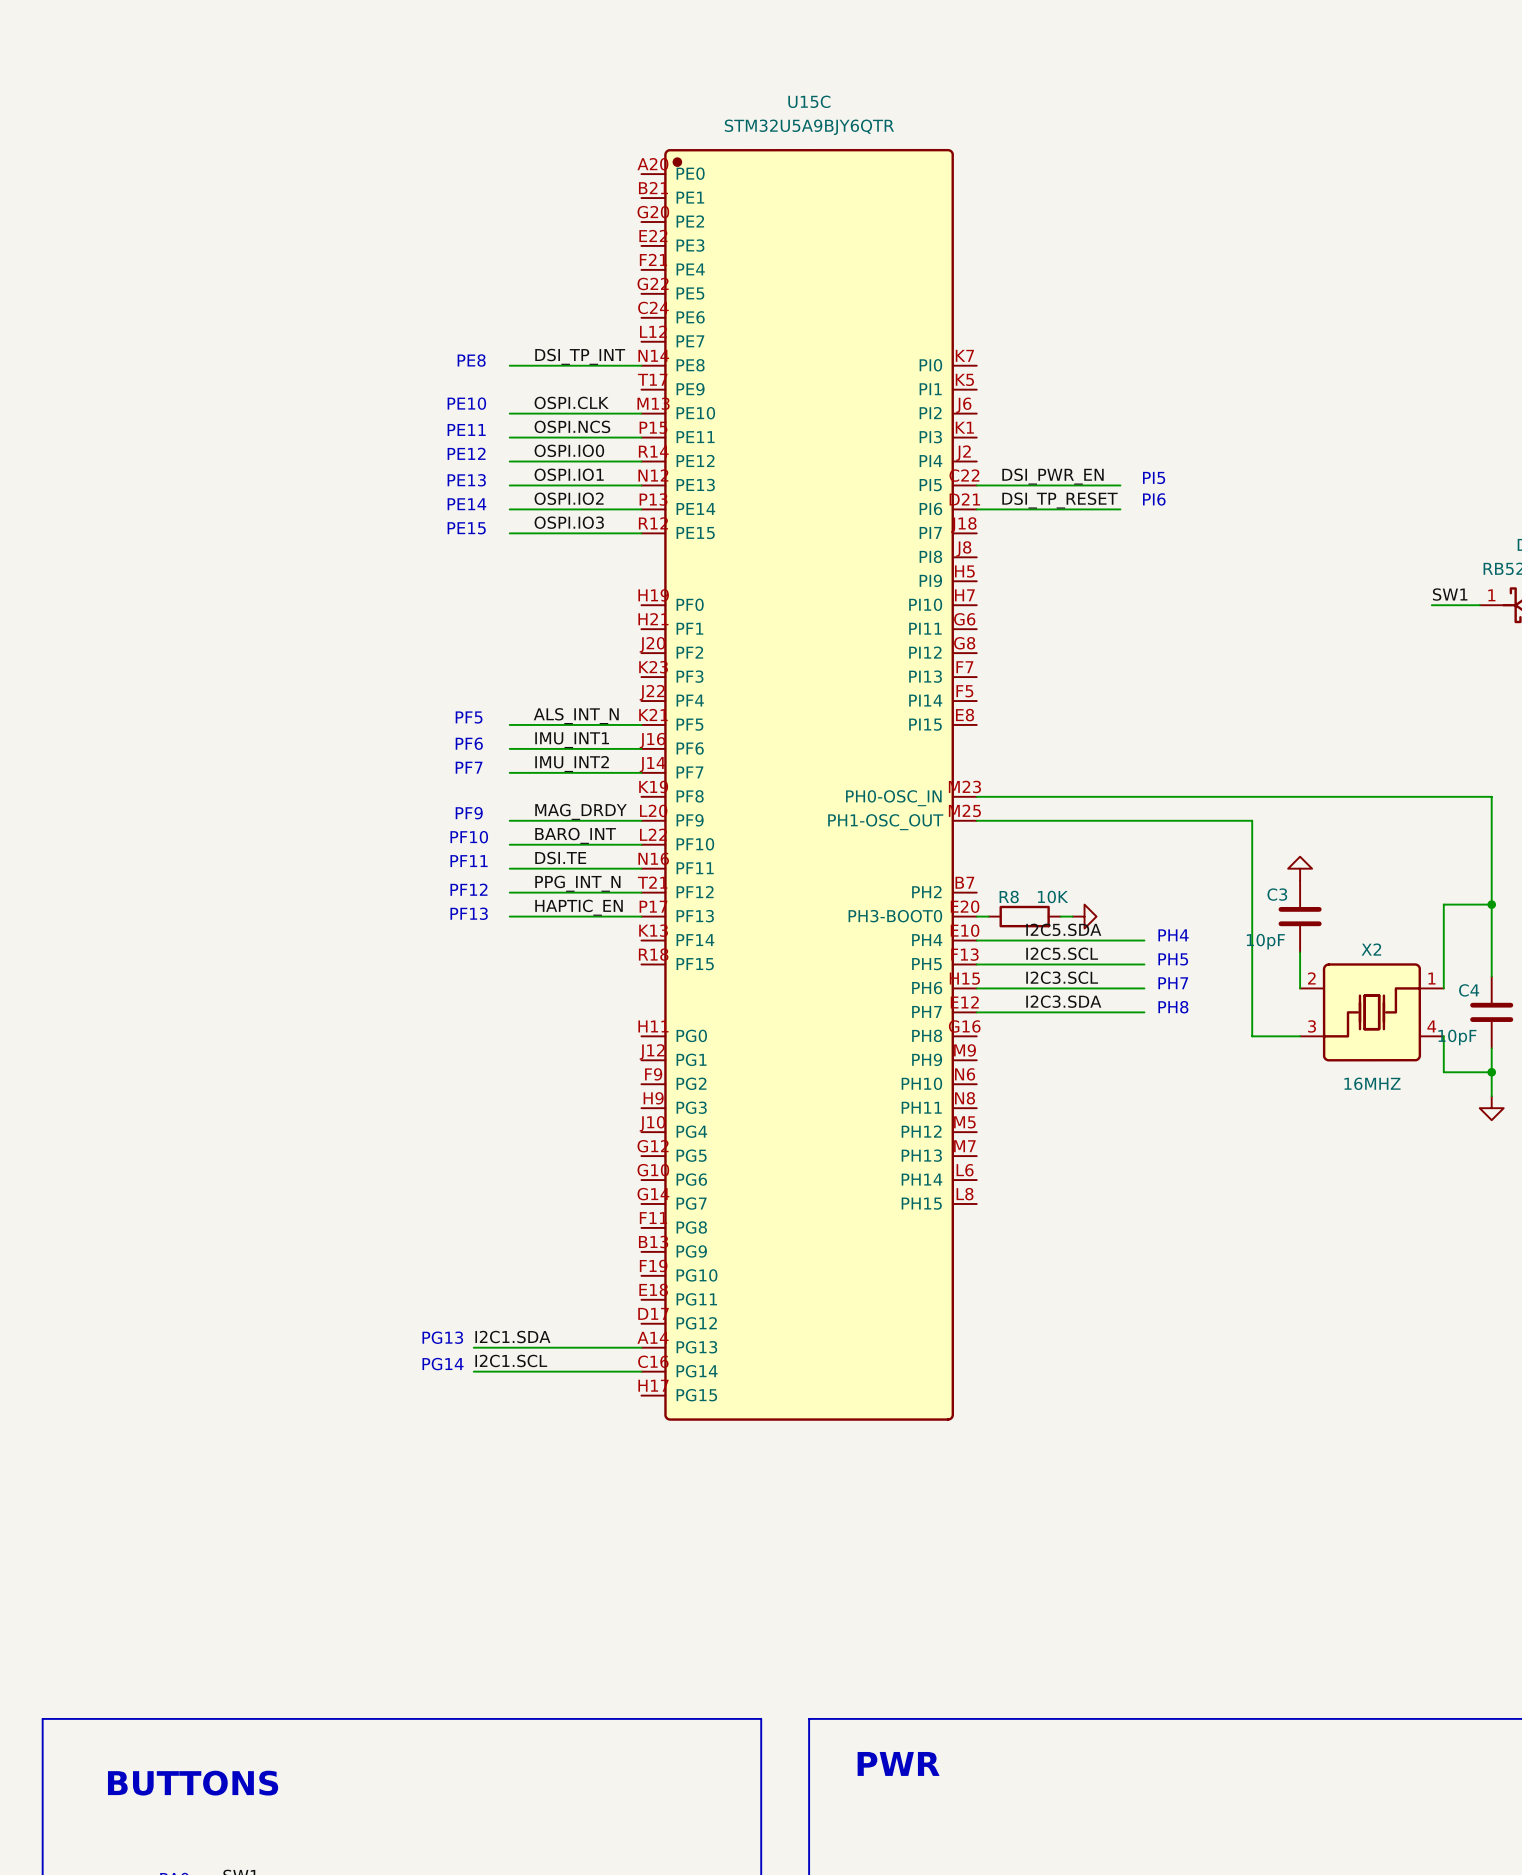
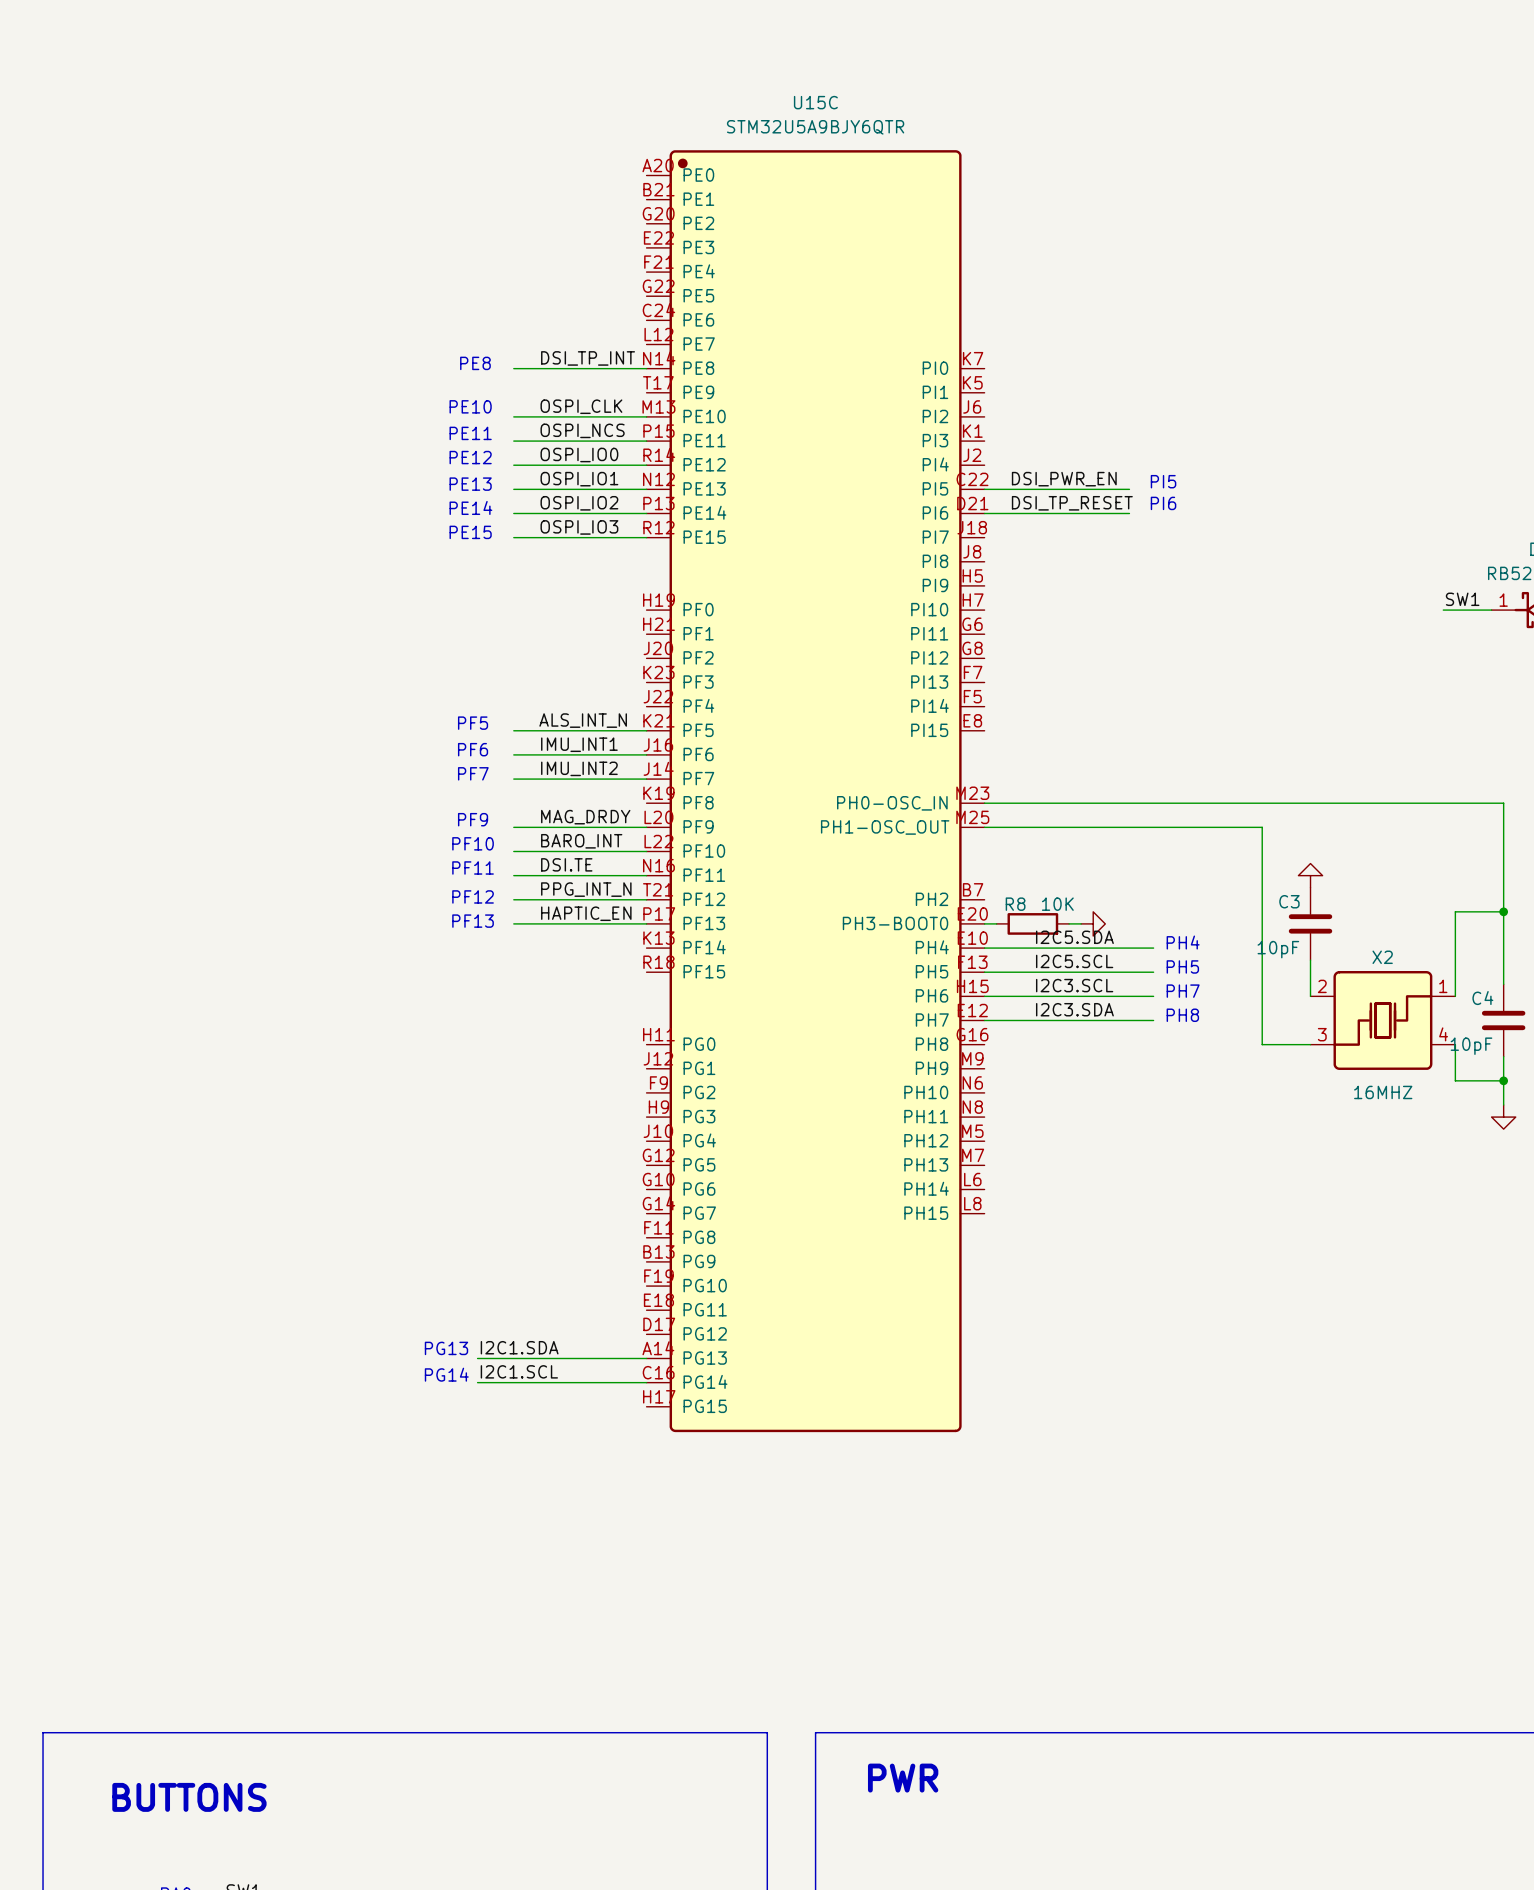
label: OSPI.CLK (571, 402) -> OSPI_CLK (581, 406)
label: OSPI.NCS (572, 426) -> OSPI_NCS (582, 430)
label: OSPI.IO0 (569, 450) -> OSPI_IO0 (579, 455)
label: OSPI.IO1 (569, 474) -> OSPI_IO1 (579, 479)
label: OSPI.IO2 (569, 498) -> OSPI_IO2 (579, 503)
label: OSPI.IO3 (569, 522) -> OSPI_IO3 (579, 527)

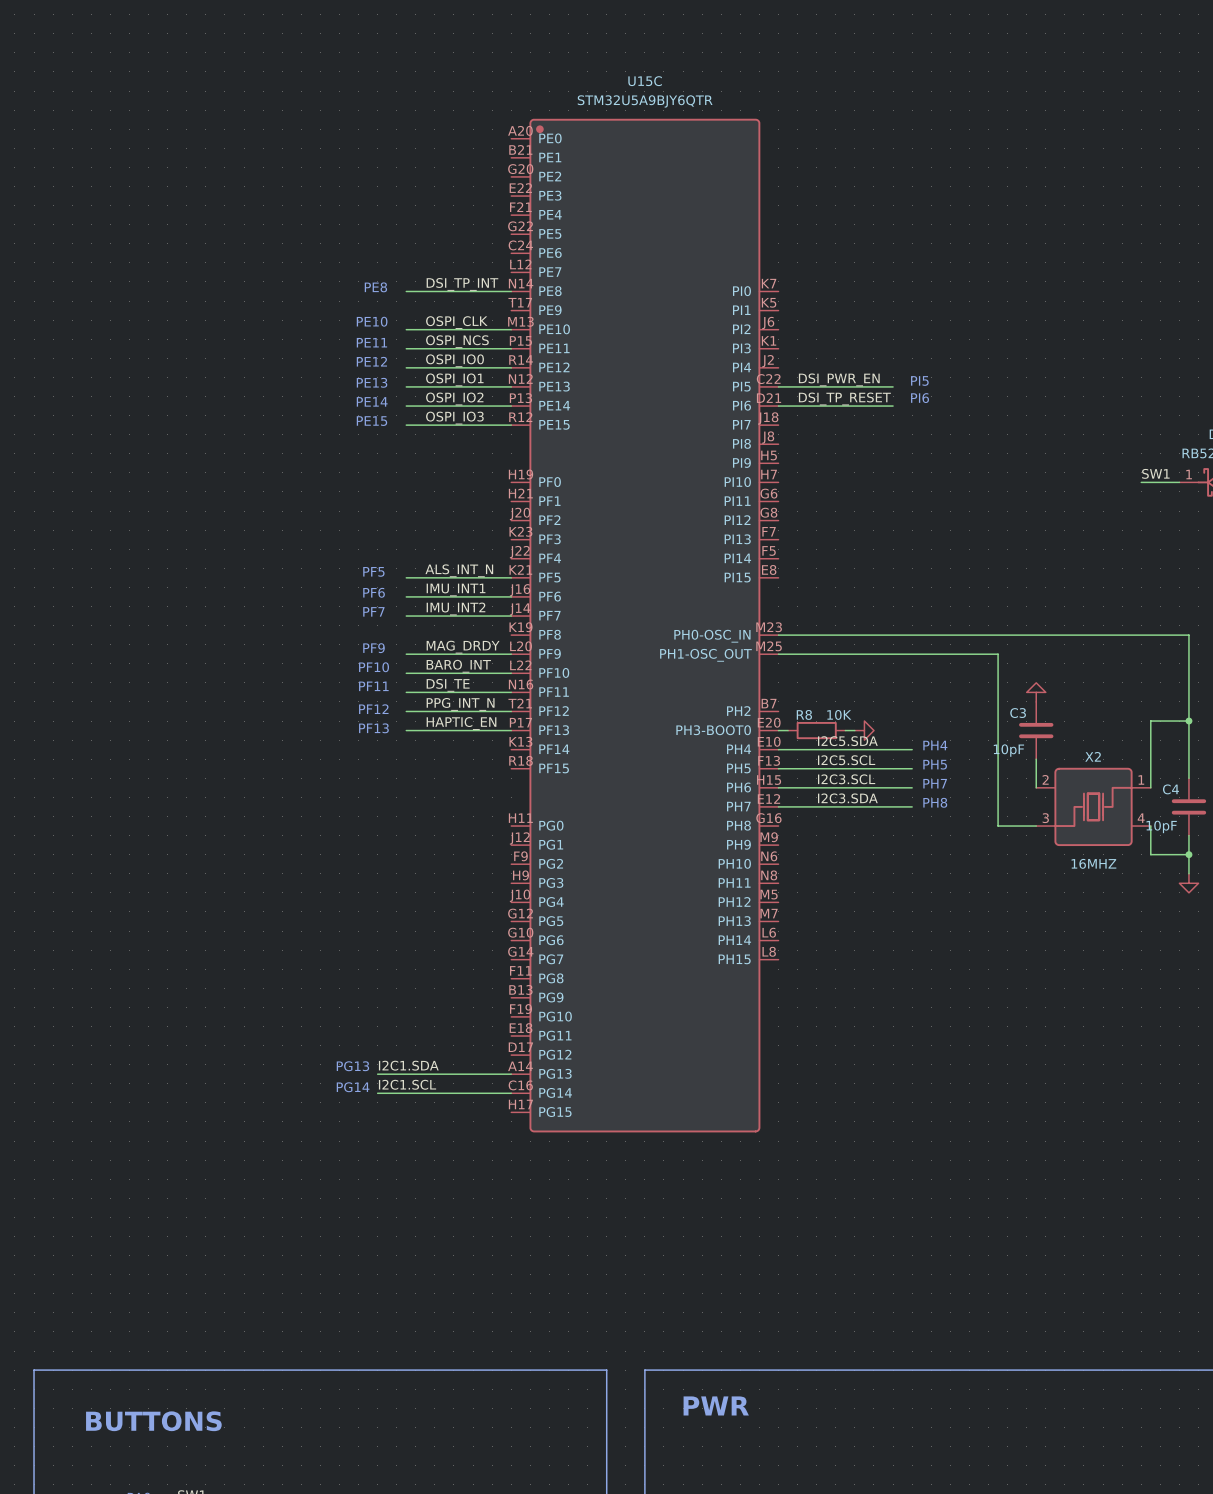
label: DSI.TE (566, 864) -> DSI_TE (448, 685)

